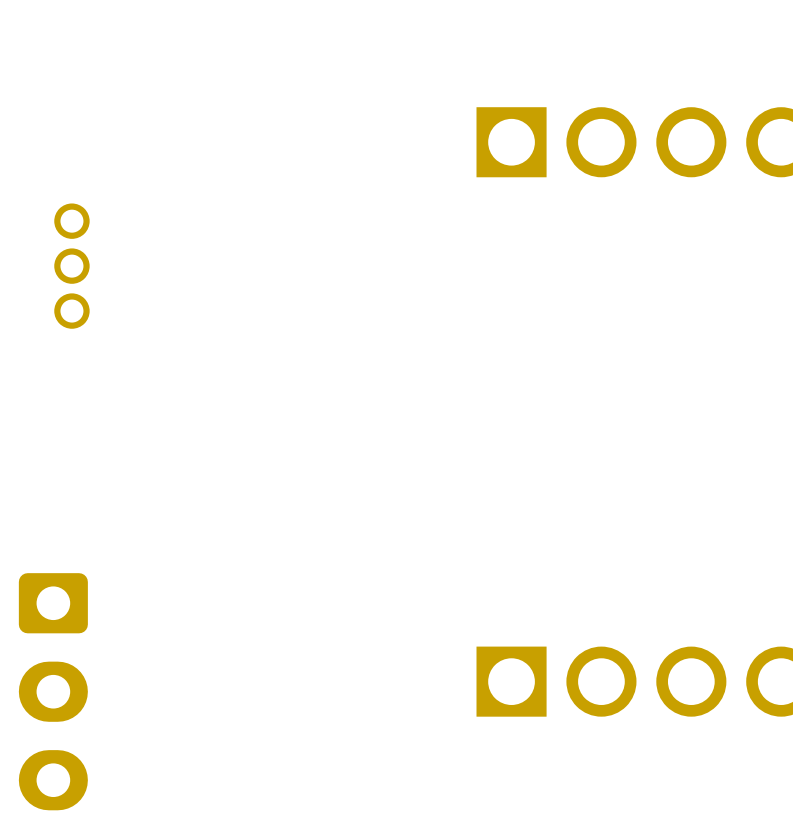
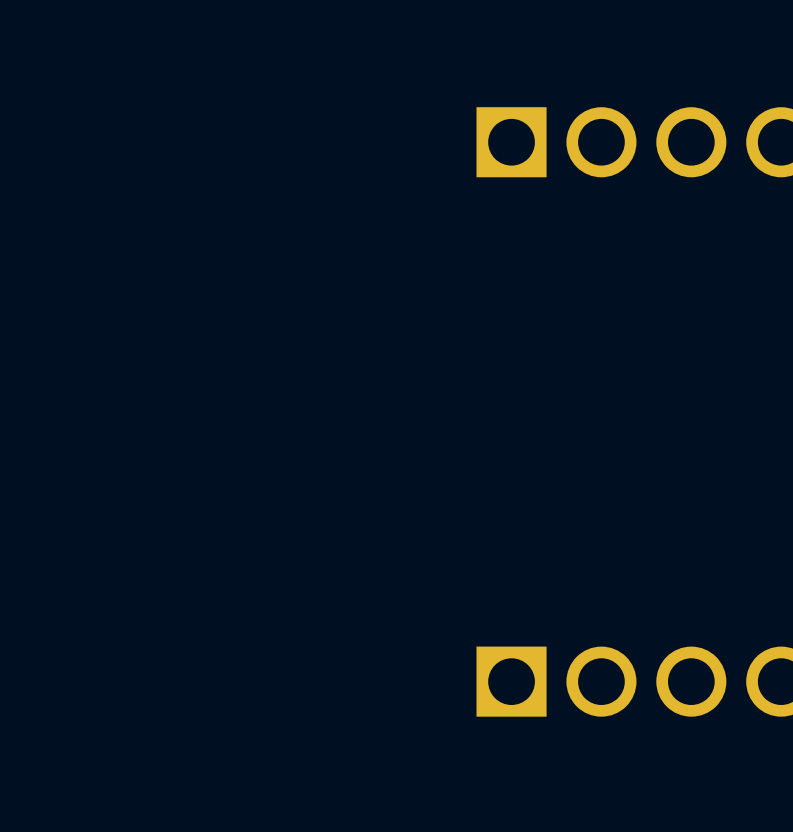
part: (71, 266) -> none
part: (53, 691) -> none

